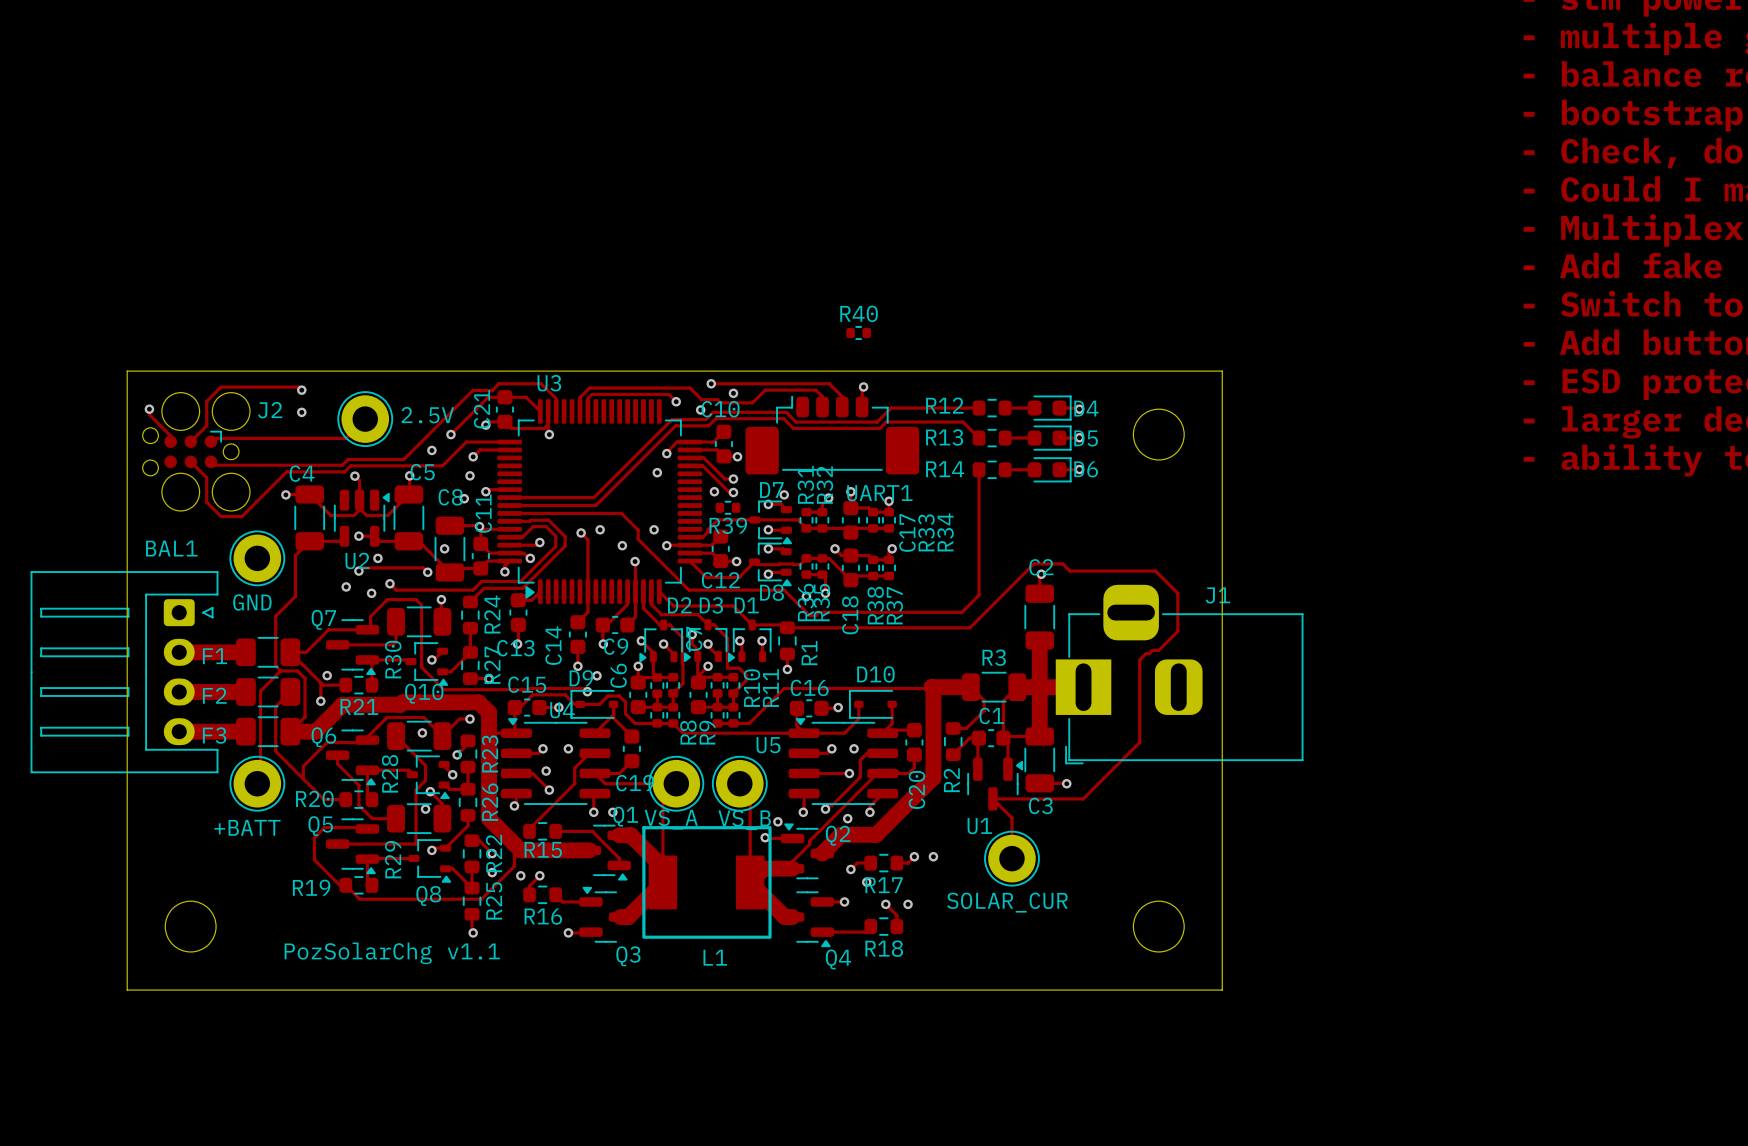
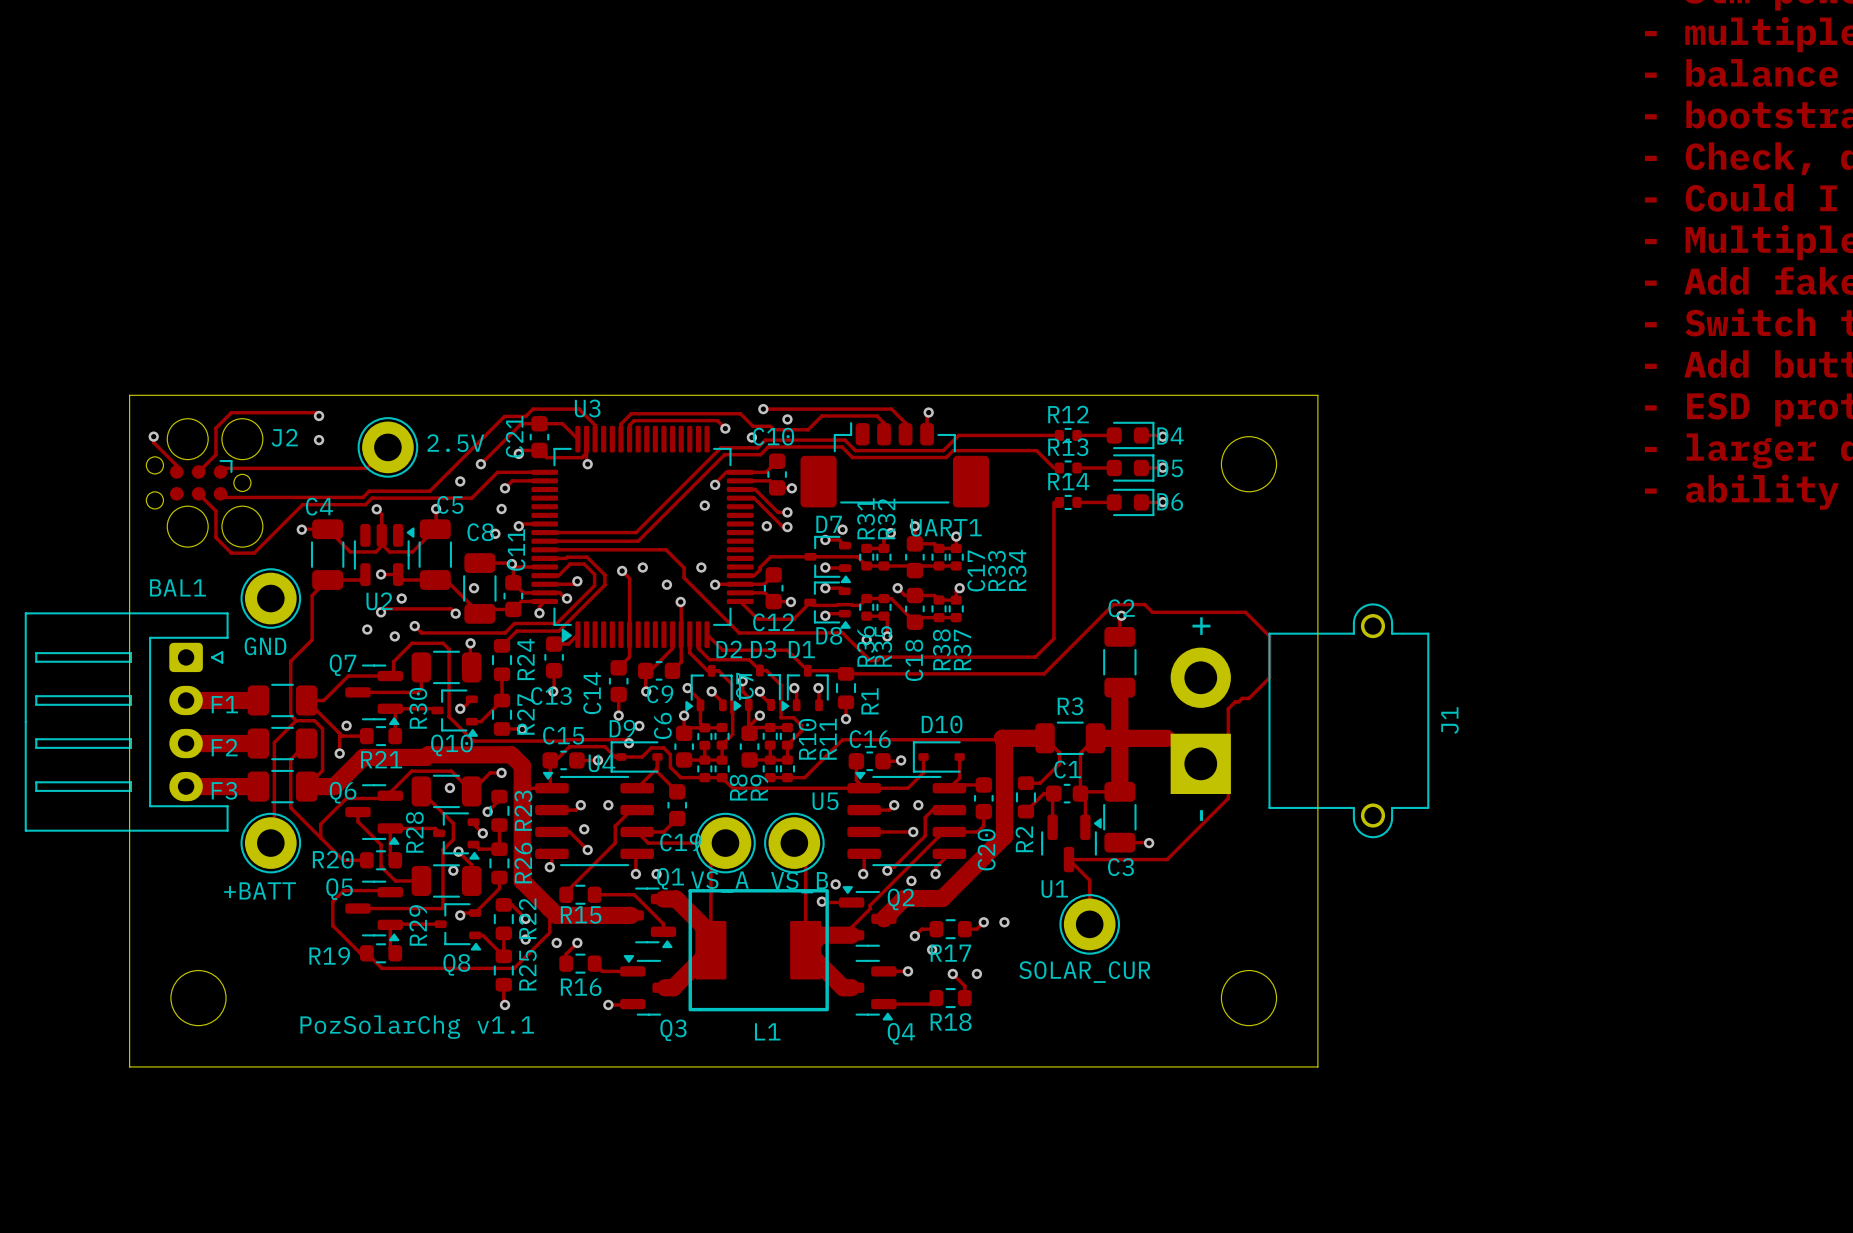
R40: (858, 333) -> none
R12 footprint: [972, 398, 1012, 418] -> [1054, 427, 1082, 444]
R12 name position: R12 (944, 405) -> R12 (1068, 414)
R13 footprint: [972, 428, 1012, 448] -> [1054, 460, 1082, 476]
R13 name position: R13 (944, 437) -> R13 (1068, 447)
R14 footprint: [972, 460, 1012, 480] -> [1054, 494, 1082, 511]
R14 name position: R14 (945, 469) -> R14 (1068, 481)
R39: (728, 507) -> none
J1 footprint: [1055, 584, 1304, 765] -> [1170, 603, 1430, 839]
J1 name position: J1 (1217, 595) -> J1 (1449, 720)

